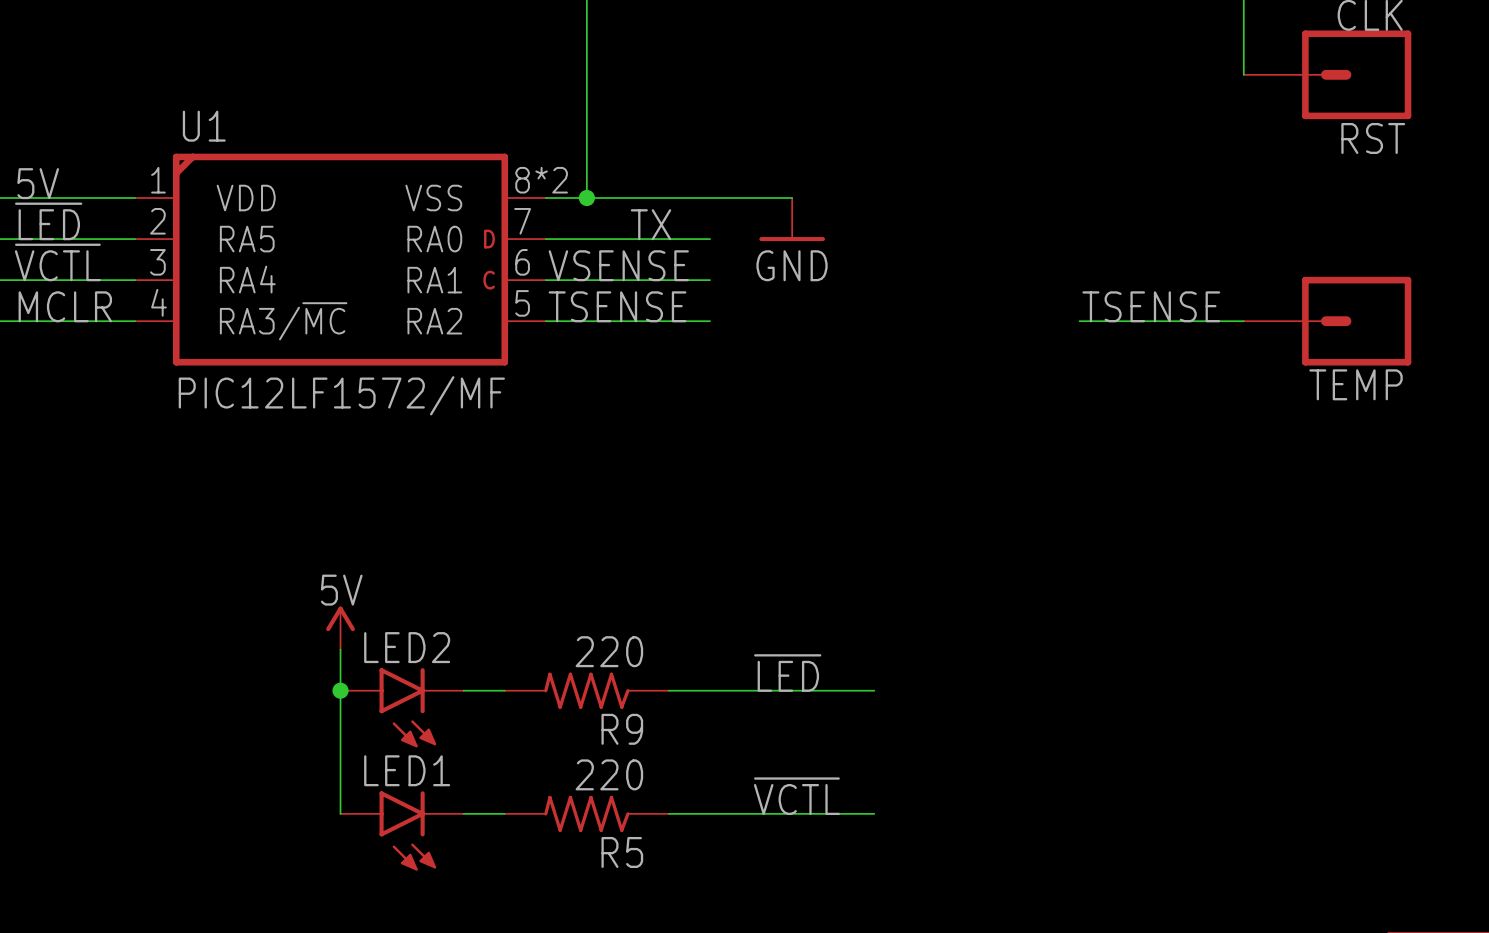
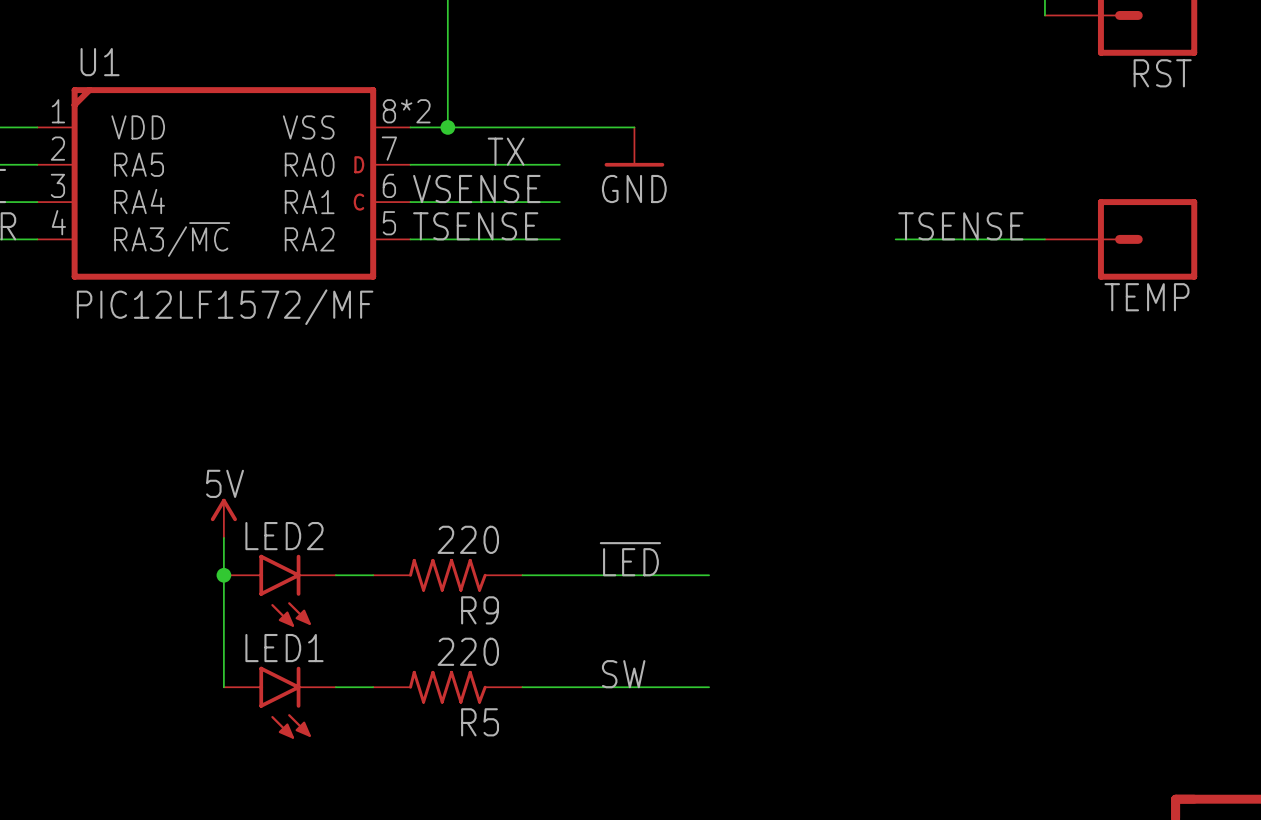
label: ~{VCTL} (796, 796) -> SW (623, 674)

